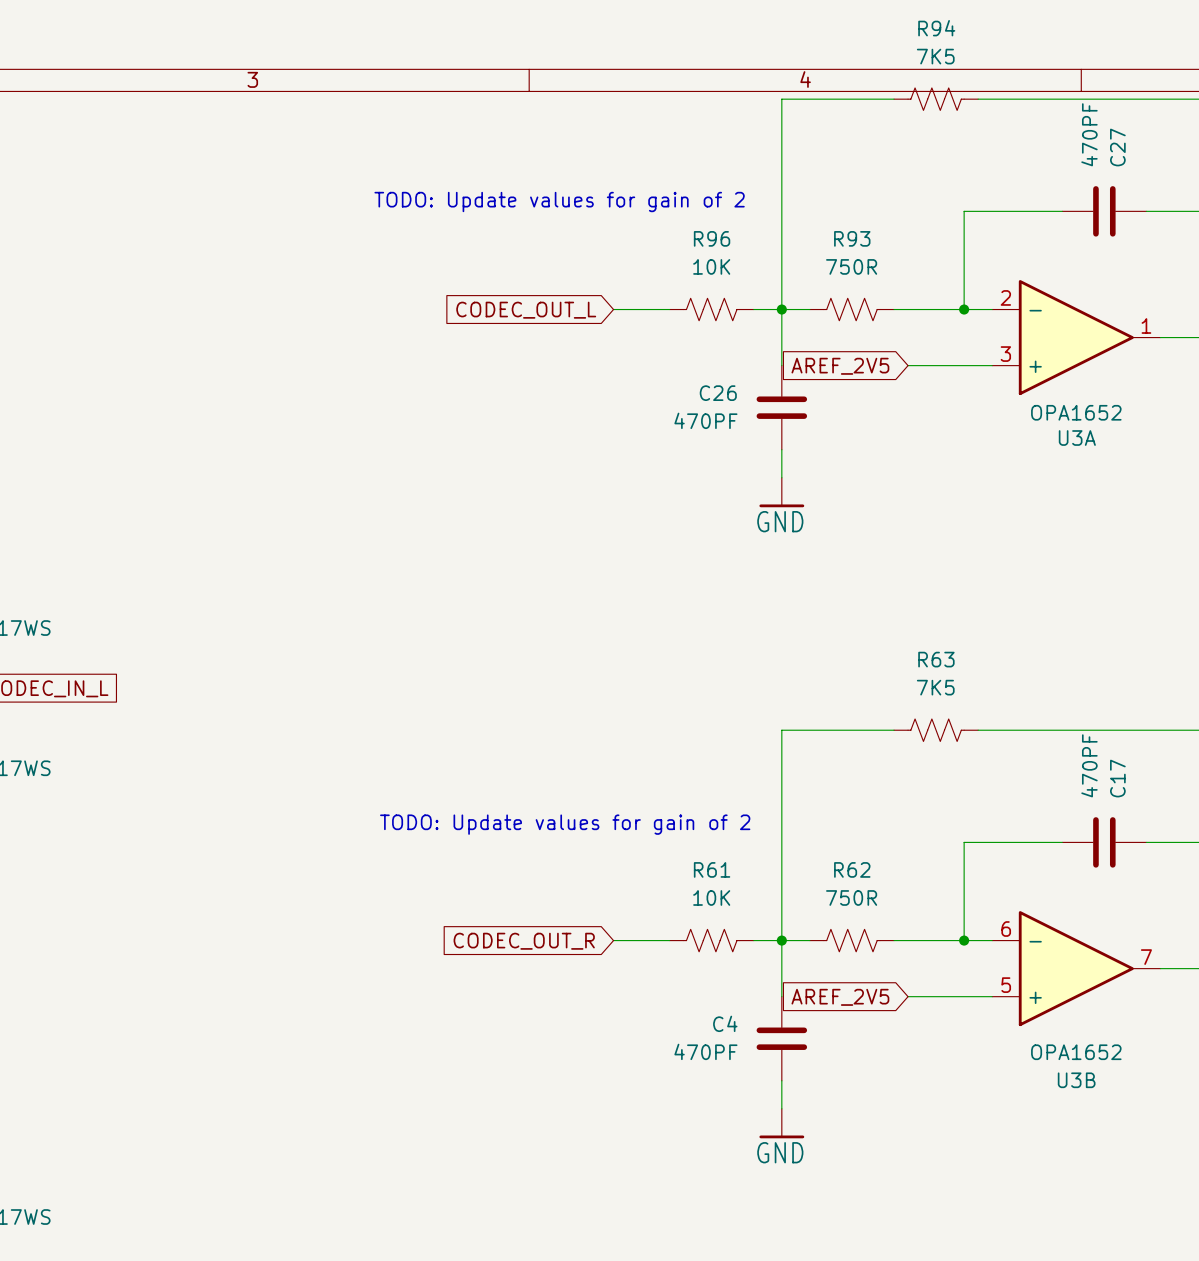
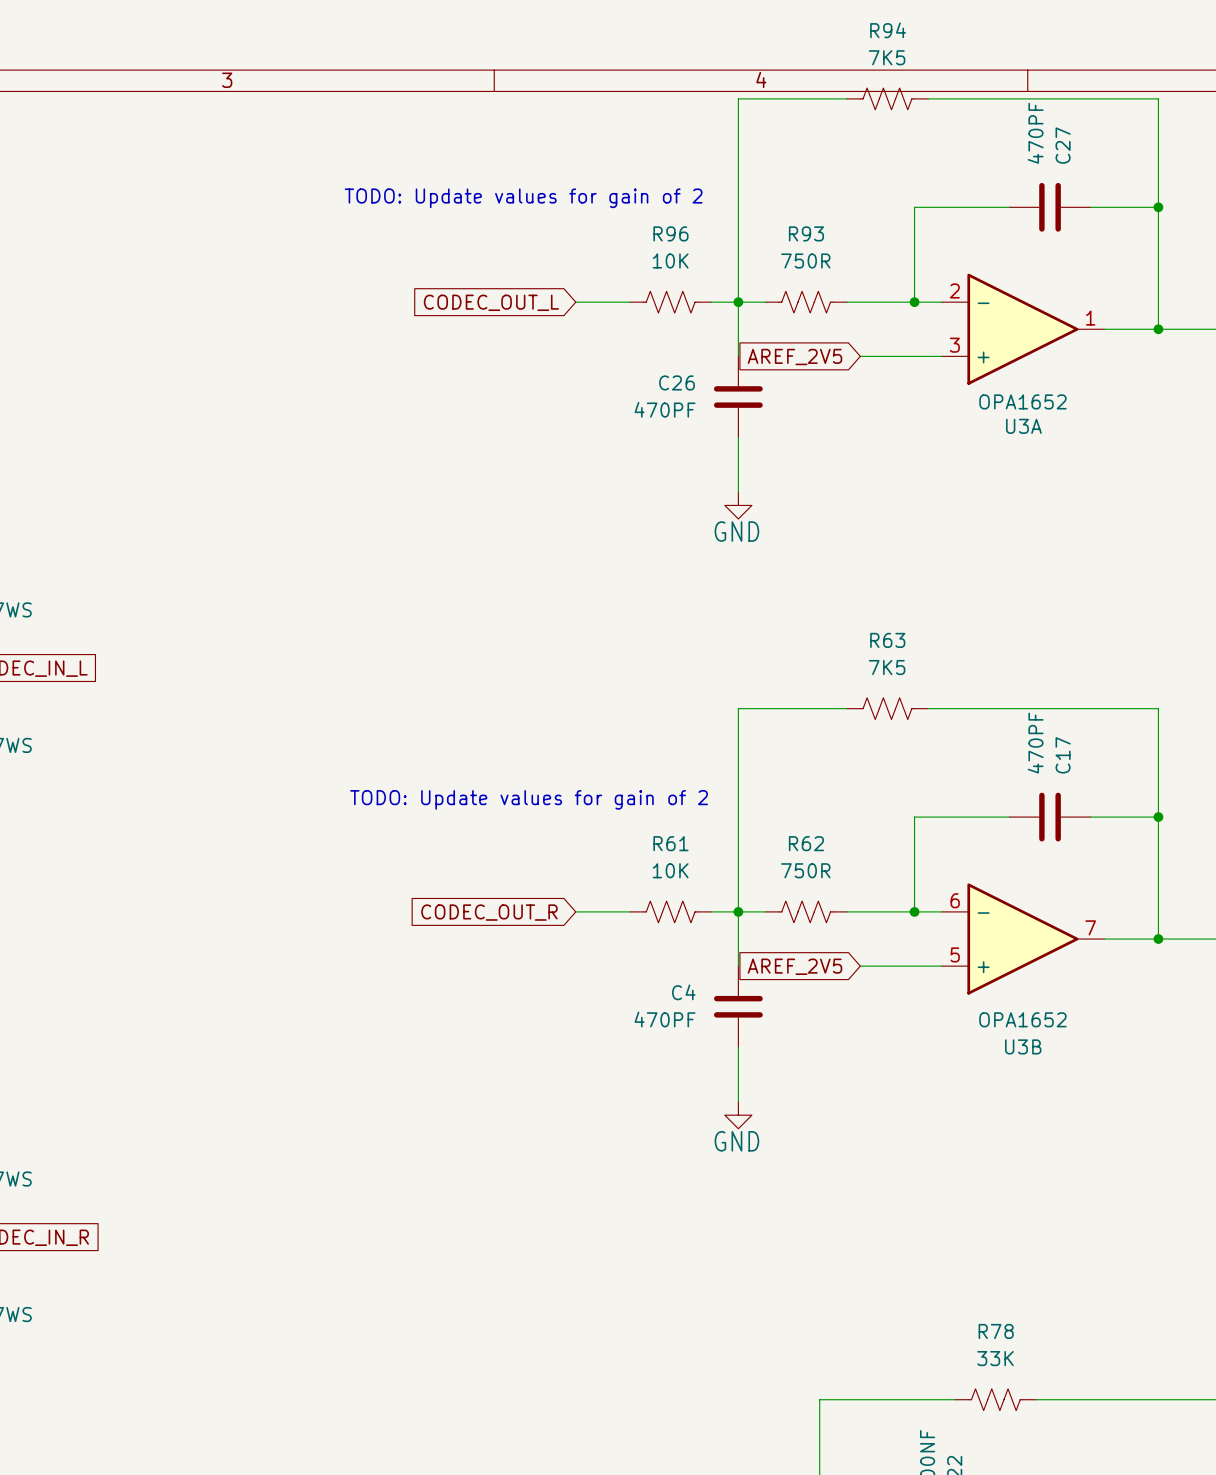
power symbol: GND (781, 492) -> none
power symbol: none -> GND (738, 505)
power symbol: GND (781, 1123) -> none
power symbol: none -> GND (738, 1115)

